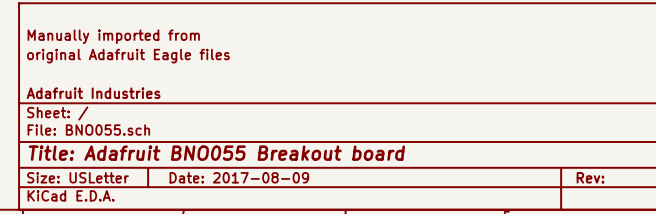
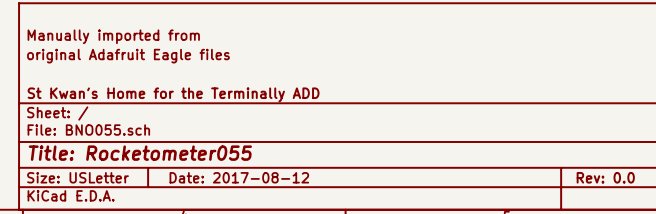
title block: Adafruit Industries (93, 93) -> St Kwan's Home for the Terminally ADD (173, 94)
title block: Title: Adafruit BNO055 Breakout board (216, 153) -> Title: Rocketometer055 (140, 153)
title block: Date: 2017-08-09 (239, 177) -> Date: 2017-08-12 (239, 177)
title block: Rev: (590, 177) -> Rev: 0.0 (605, 177)

